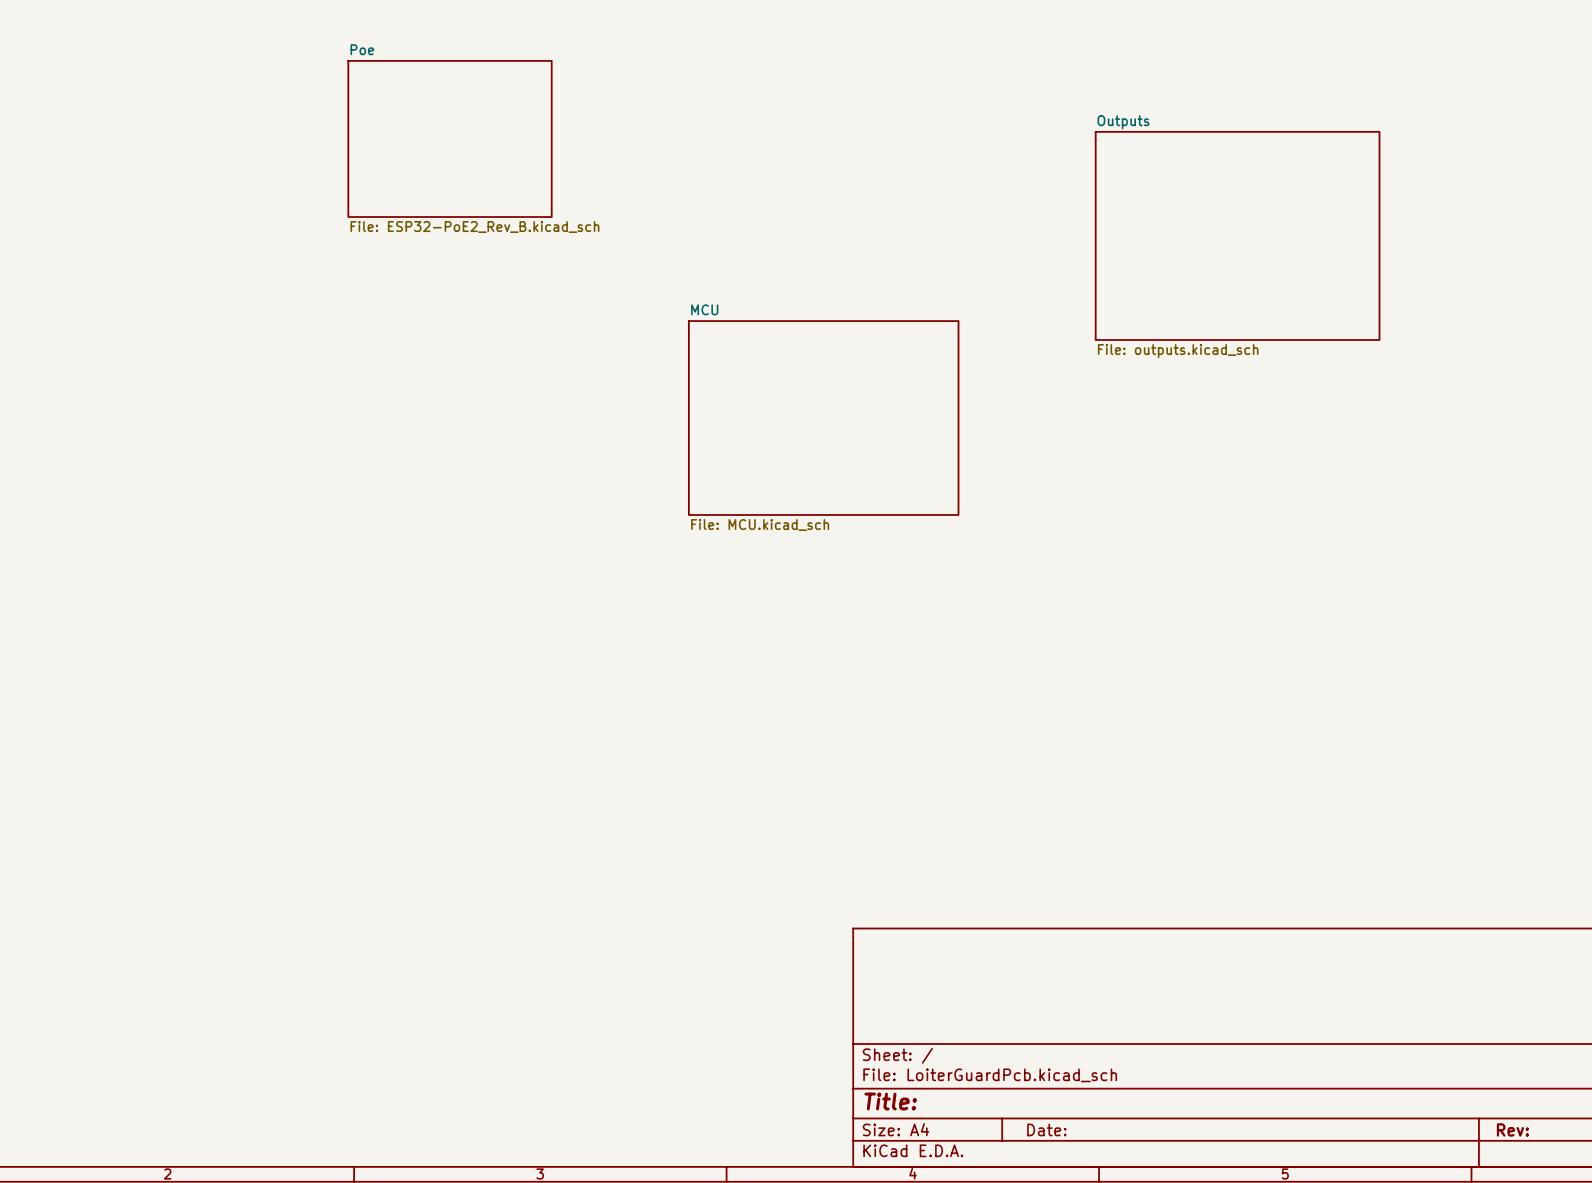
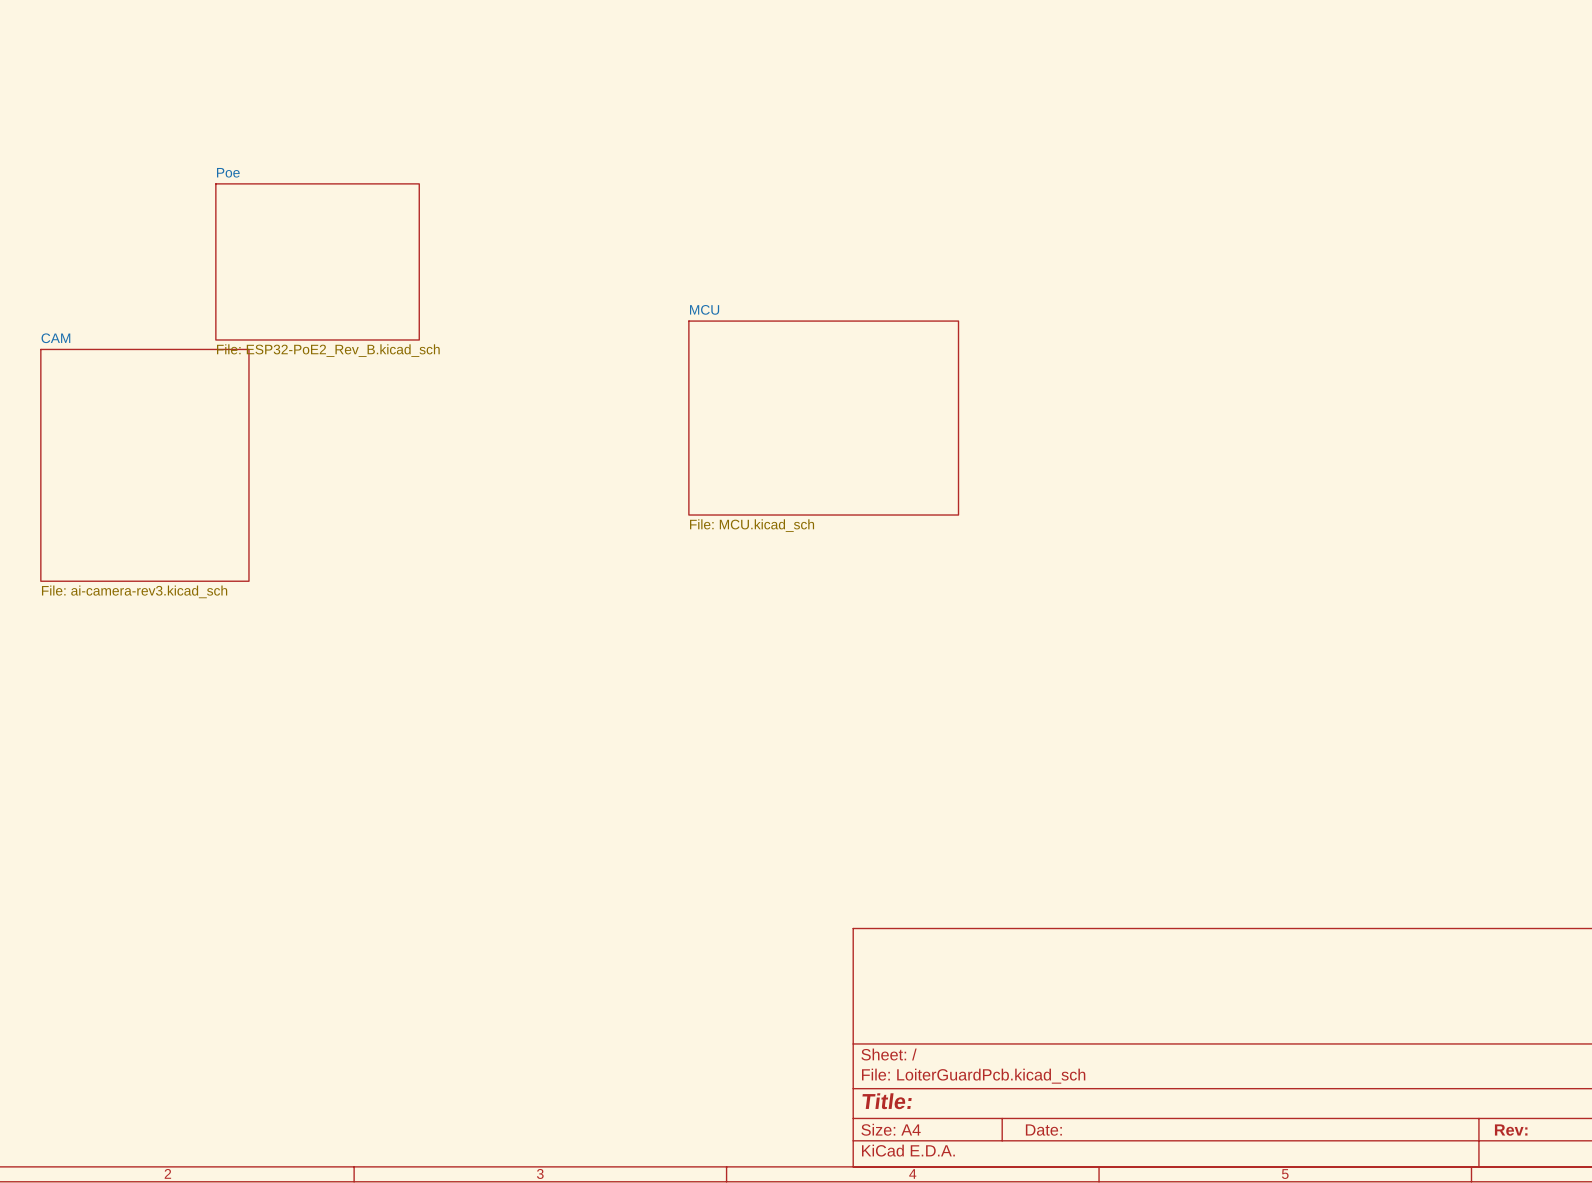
sheet Poe position: (450, 138) -> (317, 261)
sheet Outputs: File: outputs.kicad_sch (1237, 235) -> none
sheet CAM: none -> File: ai-camera-rev3.kicad_sch (144, 465)

